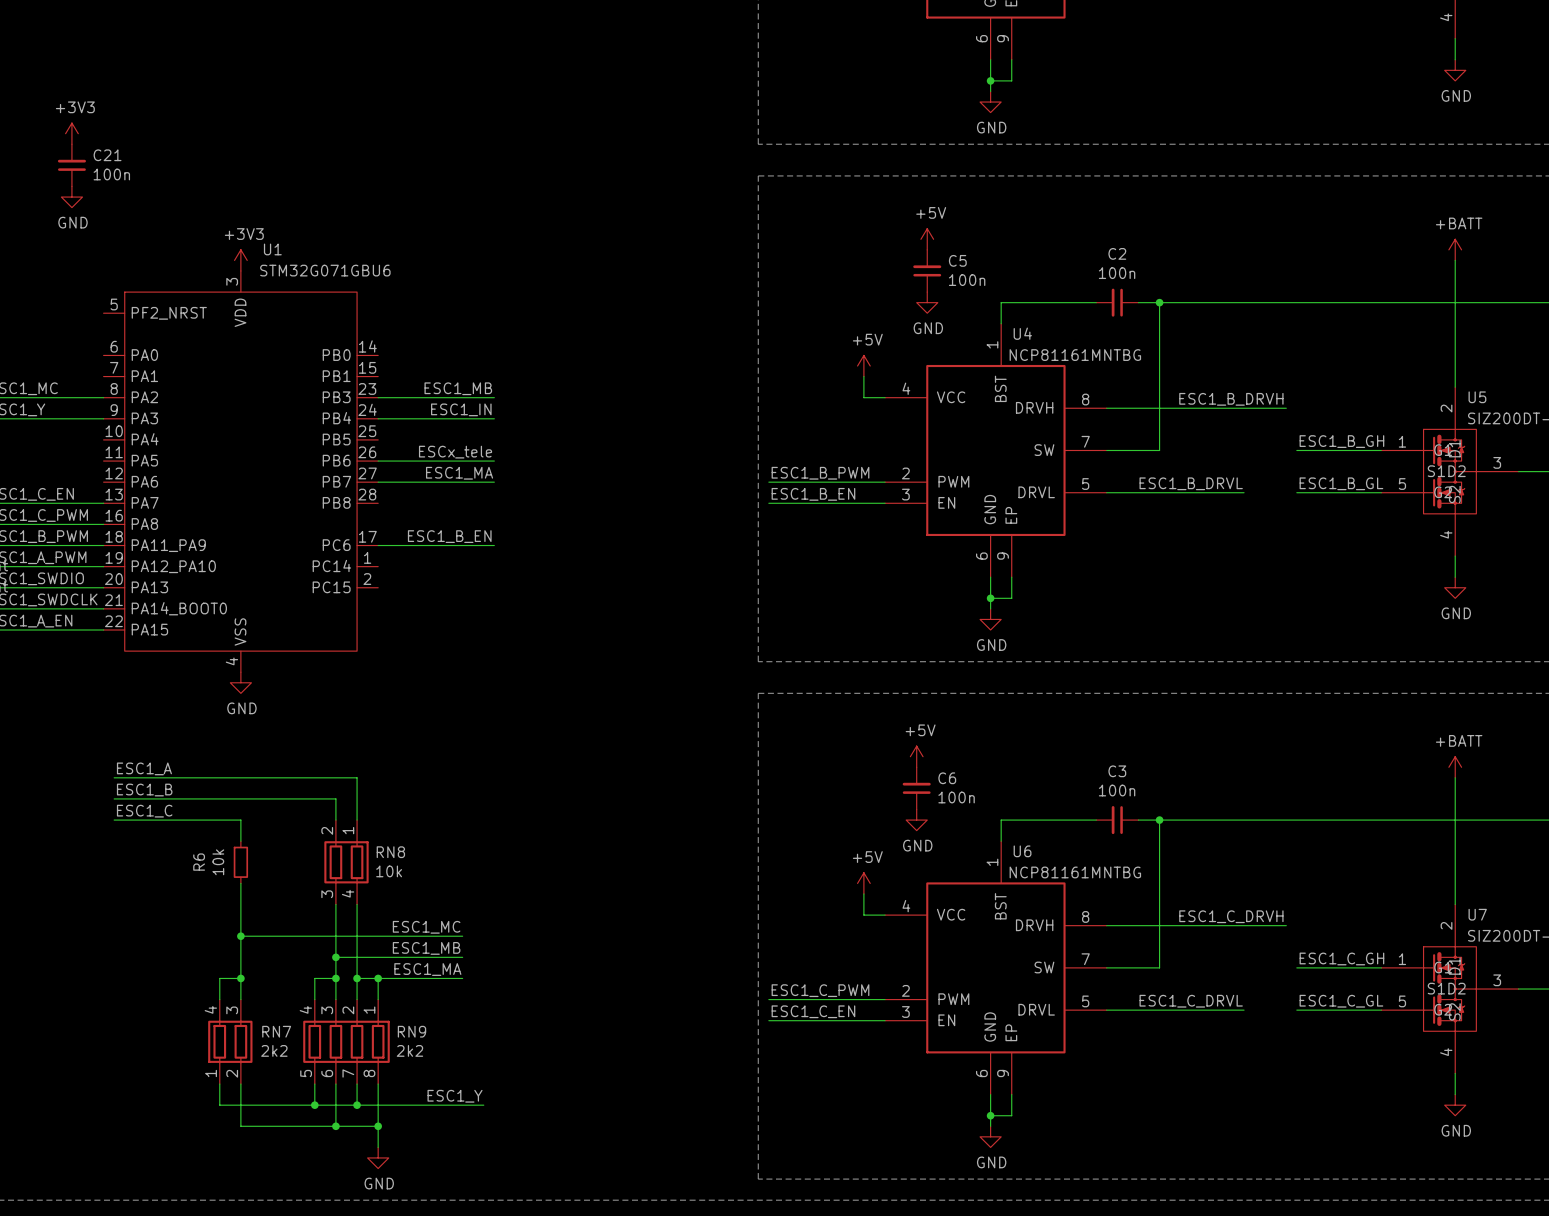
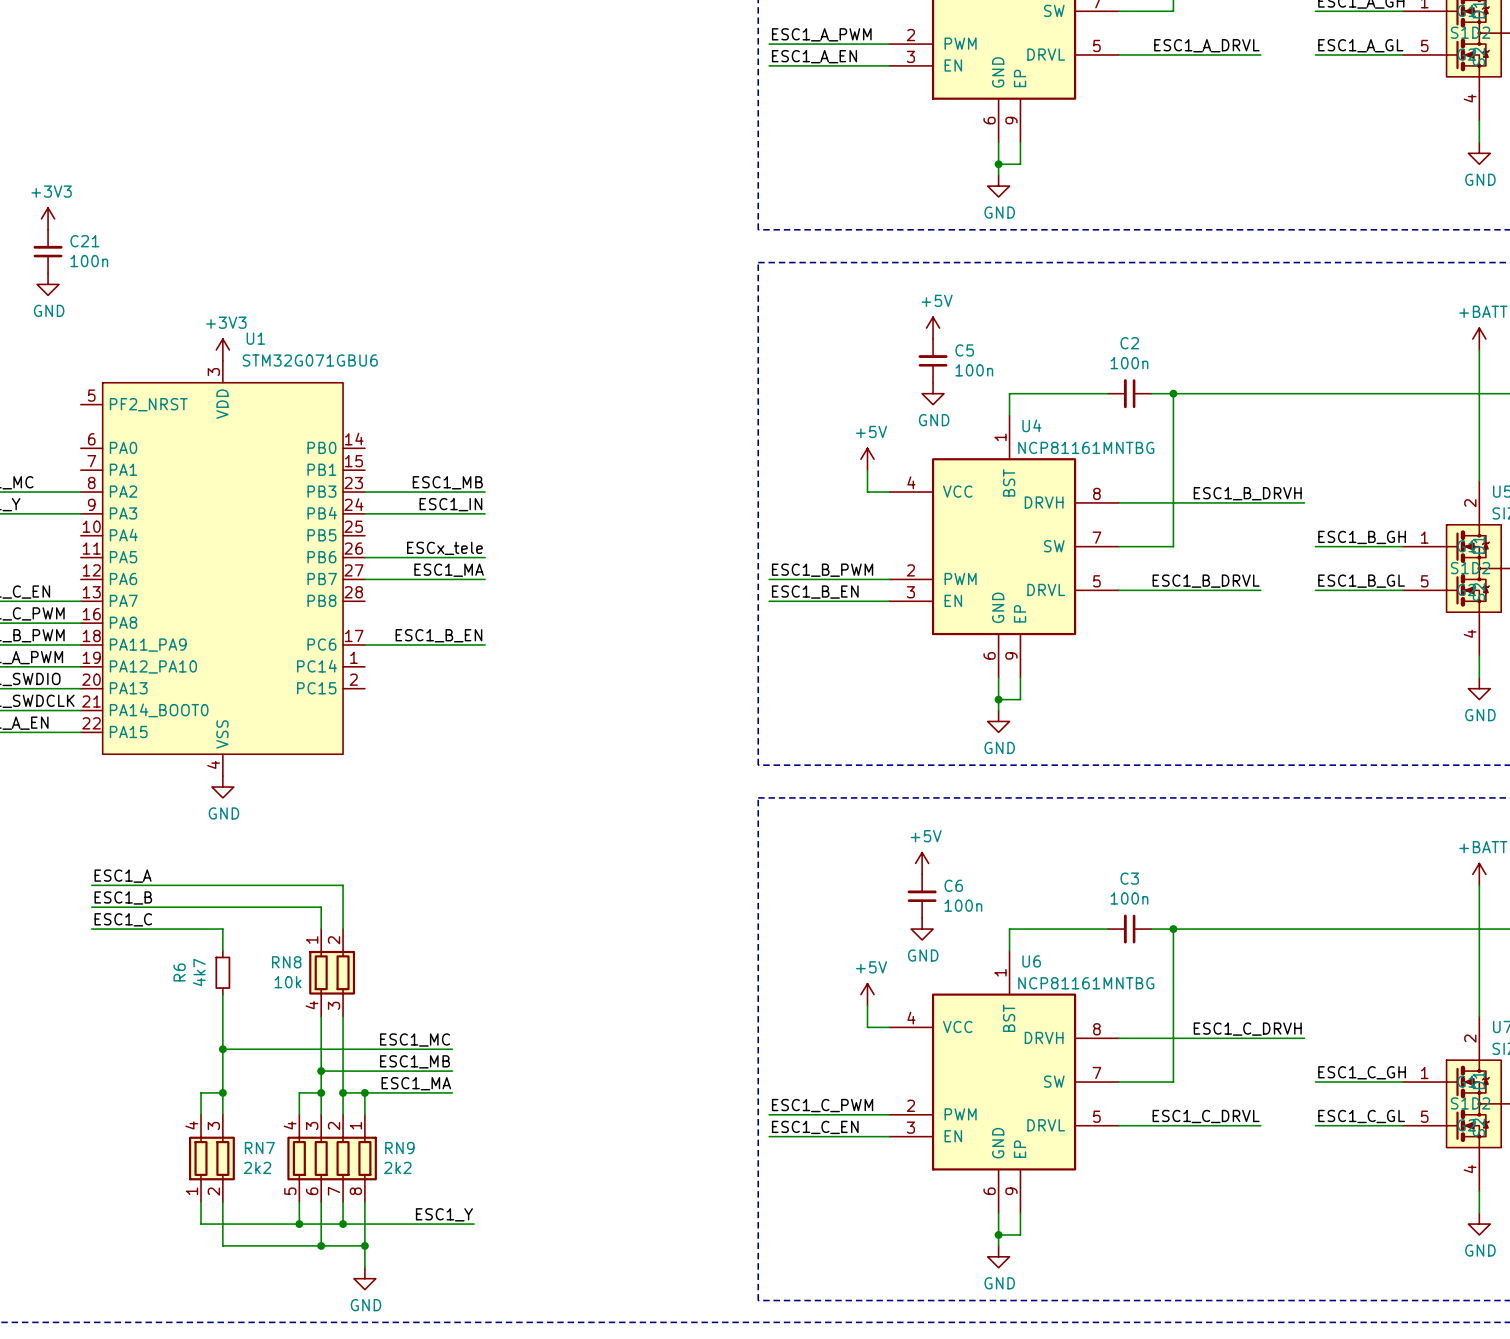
R6 value: 10k (218, 862) -> 4k7 (199, 972)
RN8 flip: as is (346, 862) -> left-right (332, 972)

